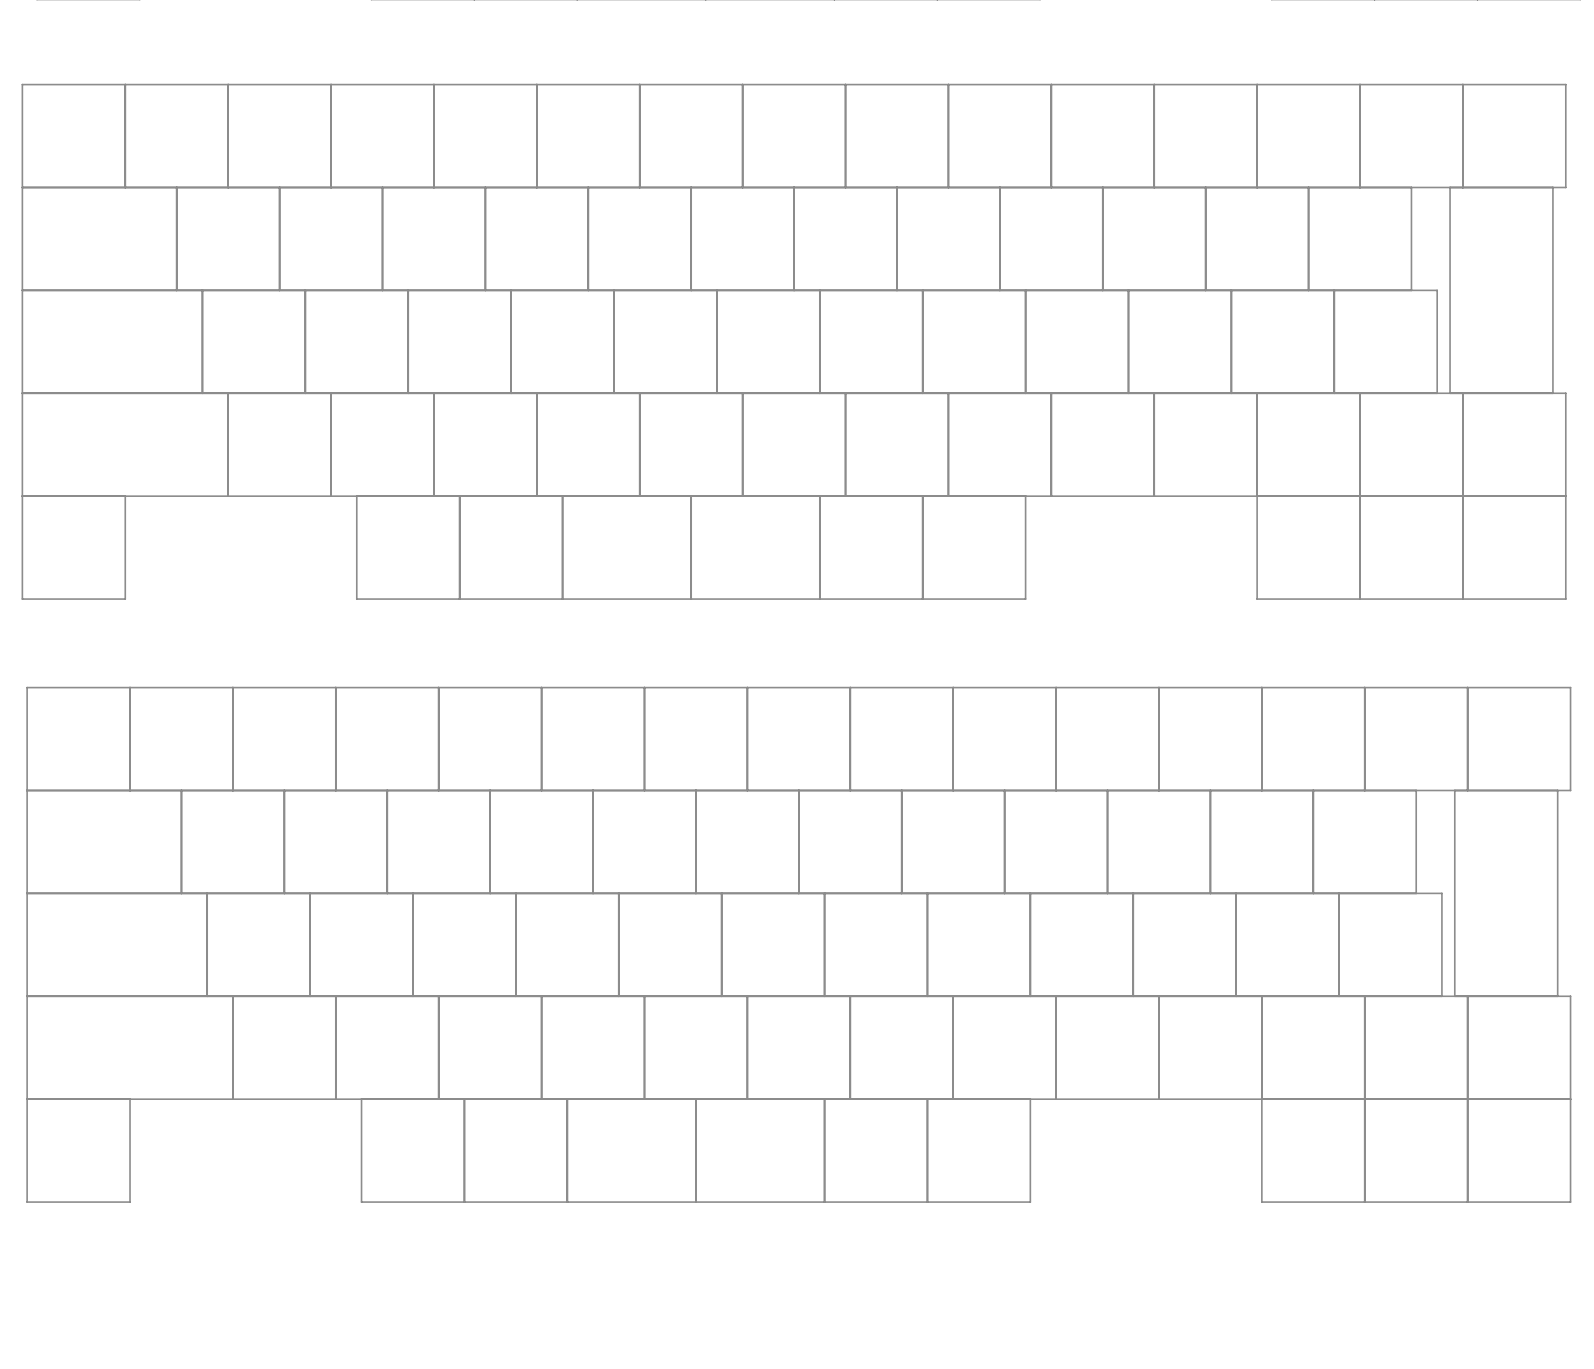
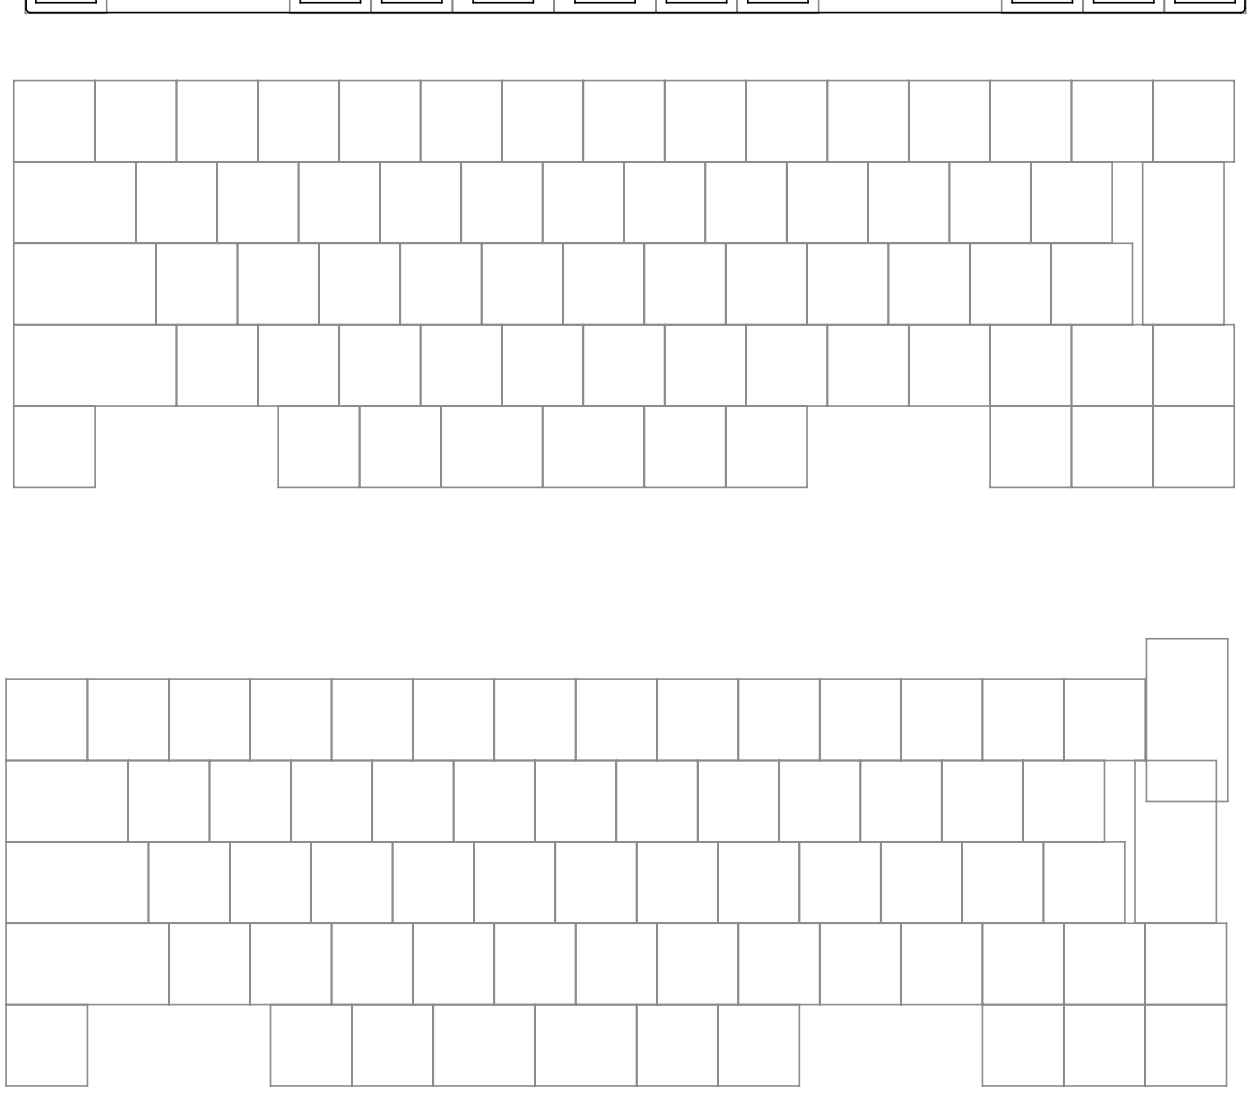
drawing: [26, 687, 1571, 1203] -> none
drawing: none -> [5, 678, 1227, 1087]

